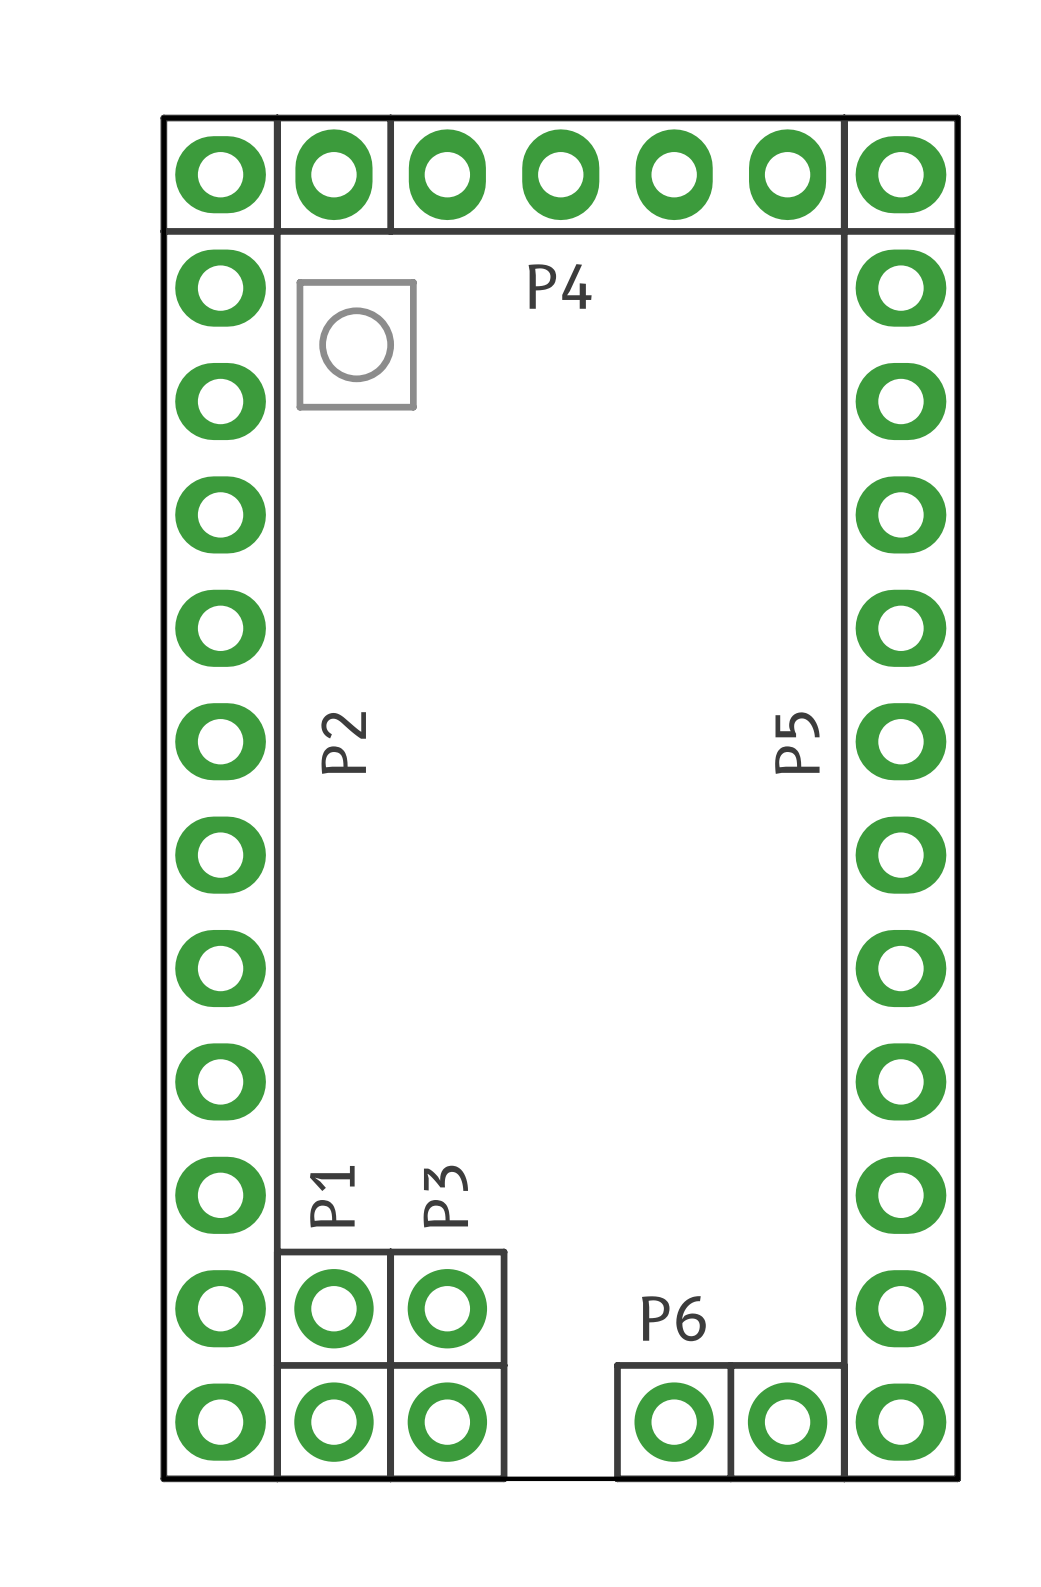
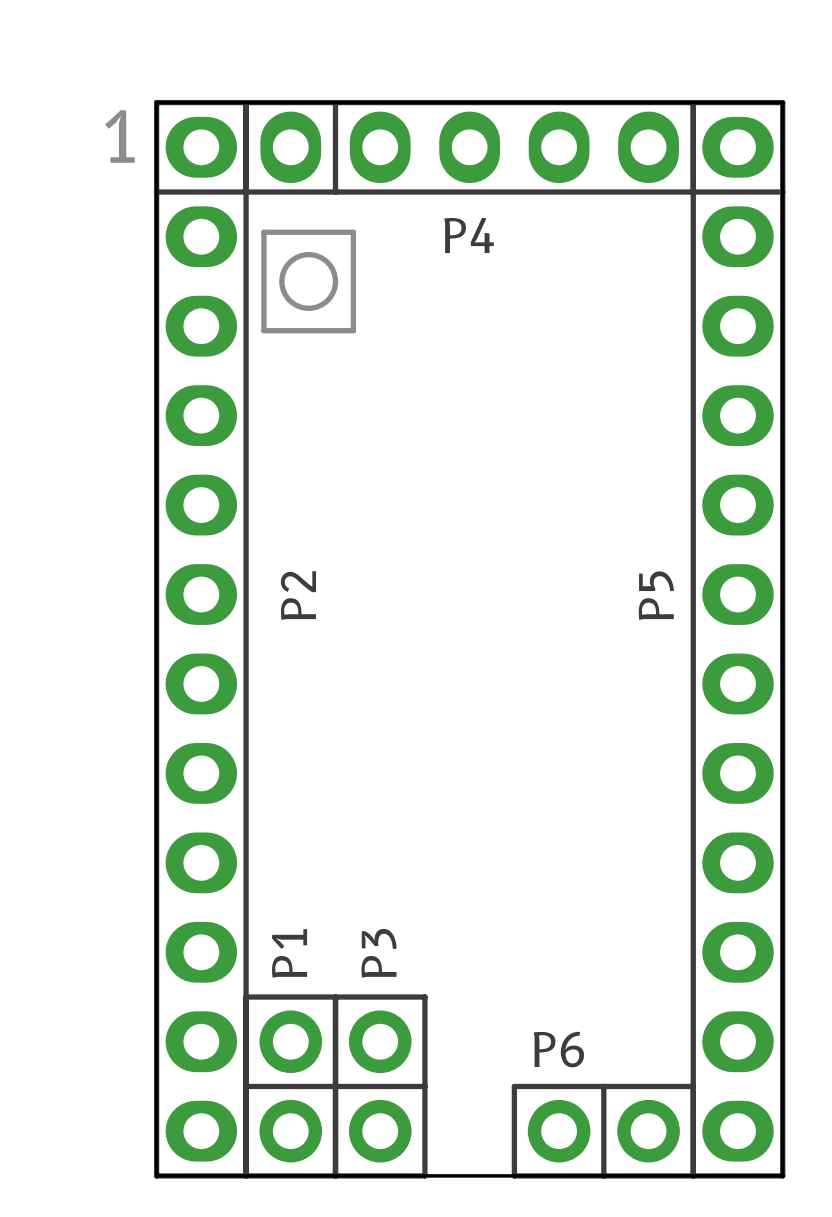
text: none -> 1 (119, 136)

